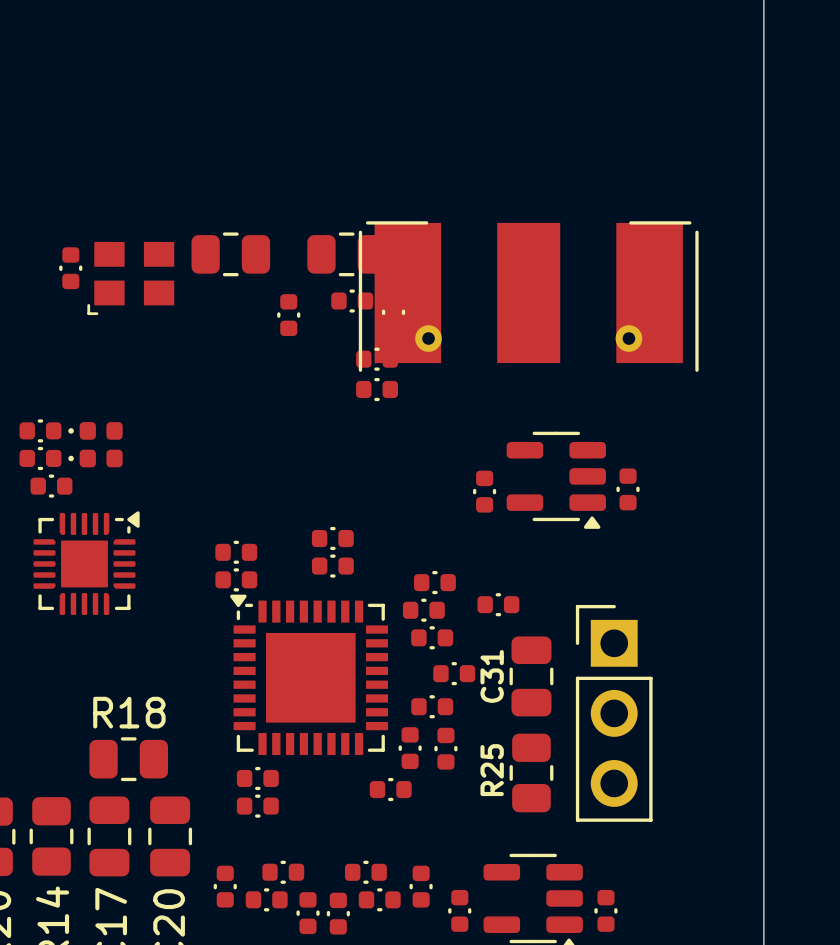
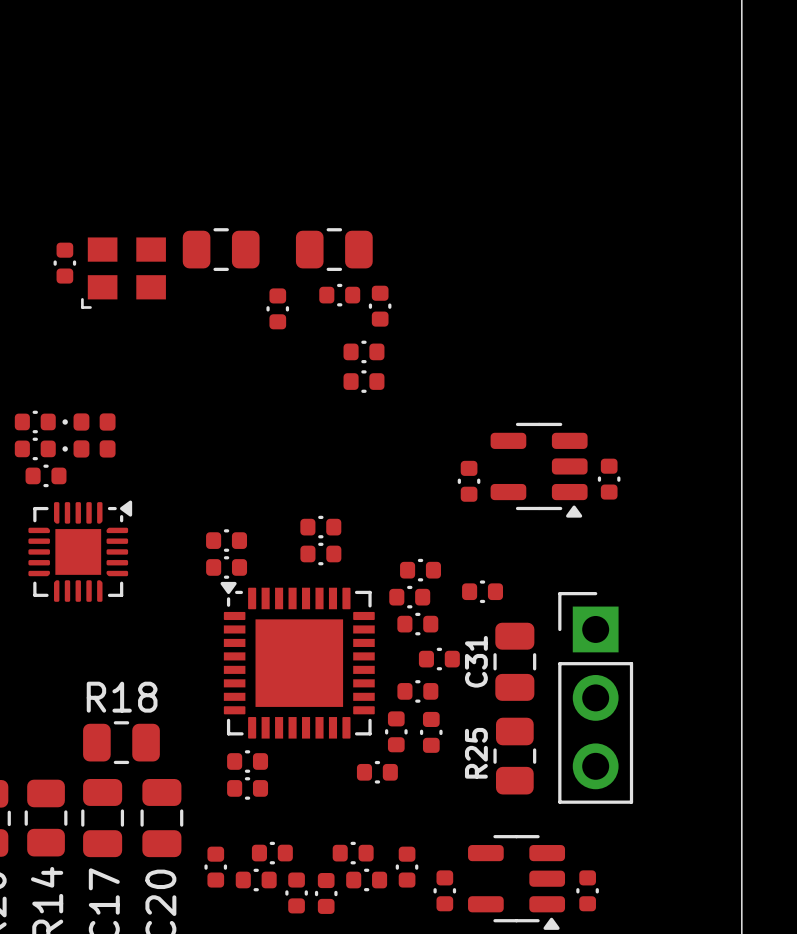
part: (528, 296) -> none

